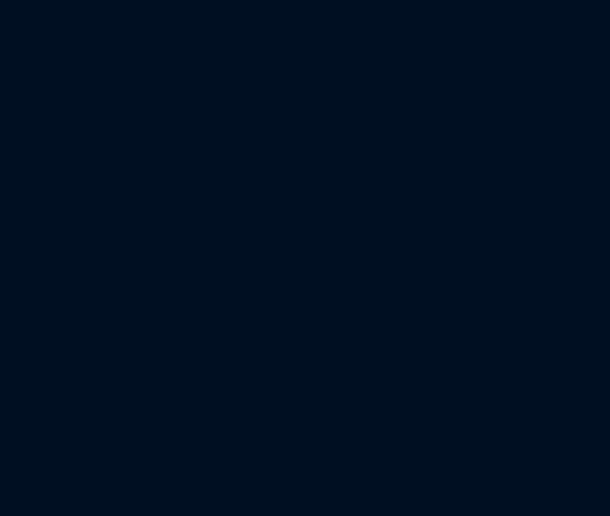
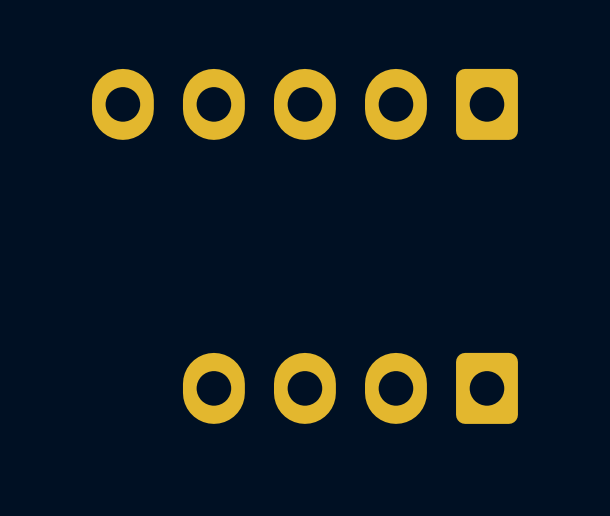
part: none -> (304, 104)
part: none -> (350, 388)

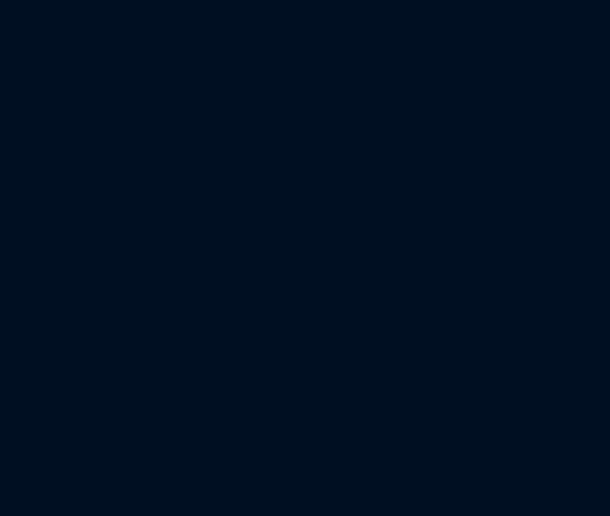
part: (304, 104) -> none
part: (350, 388) -> none

